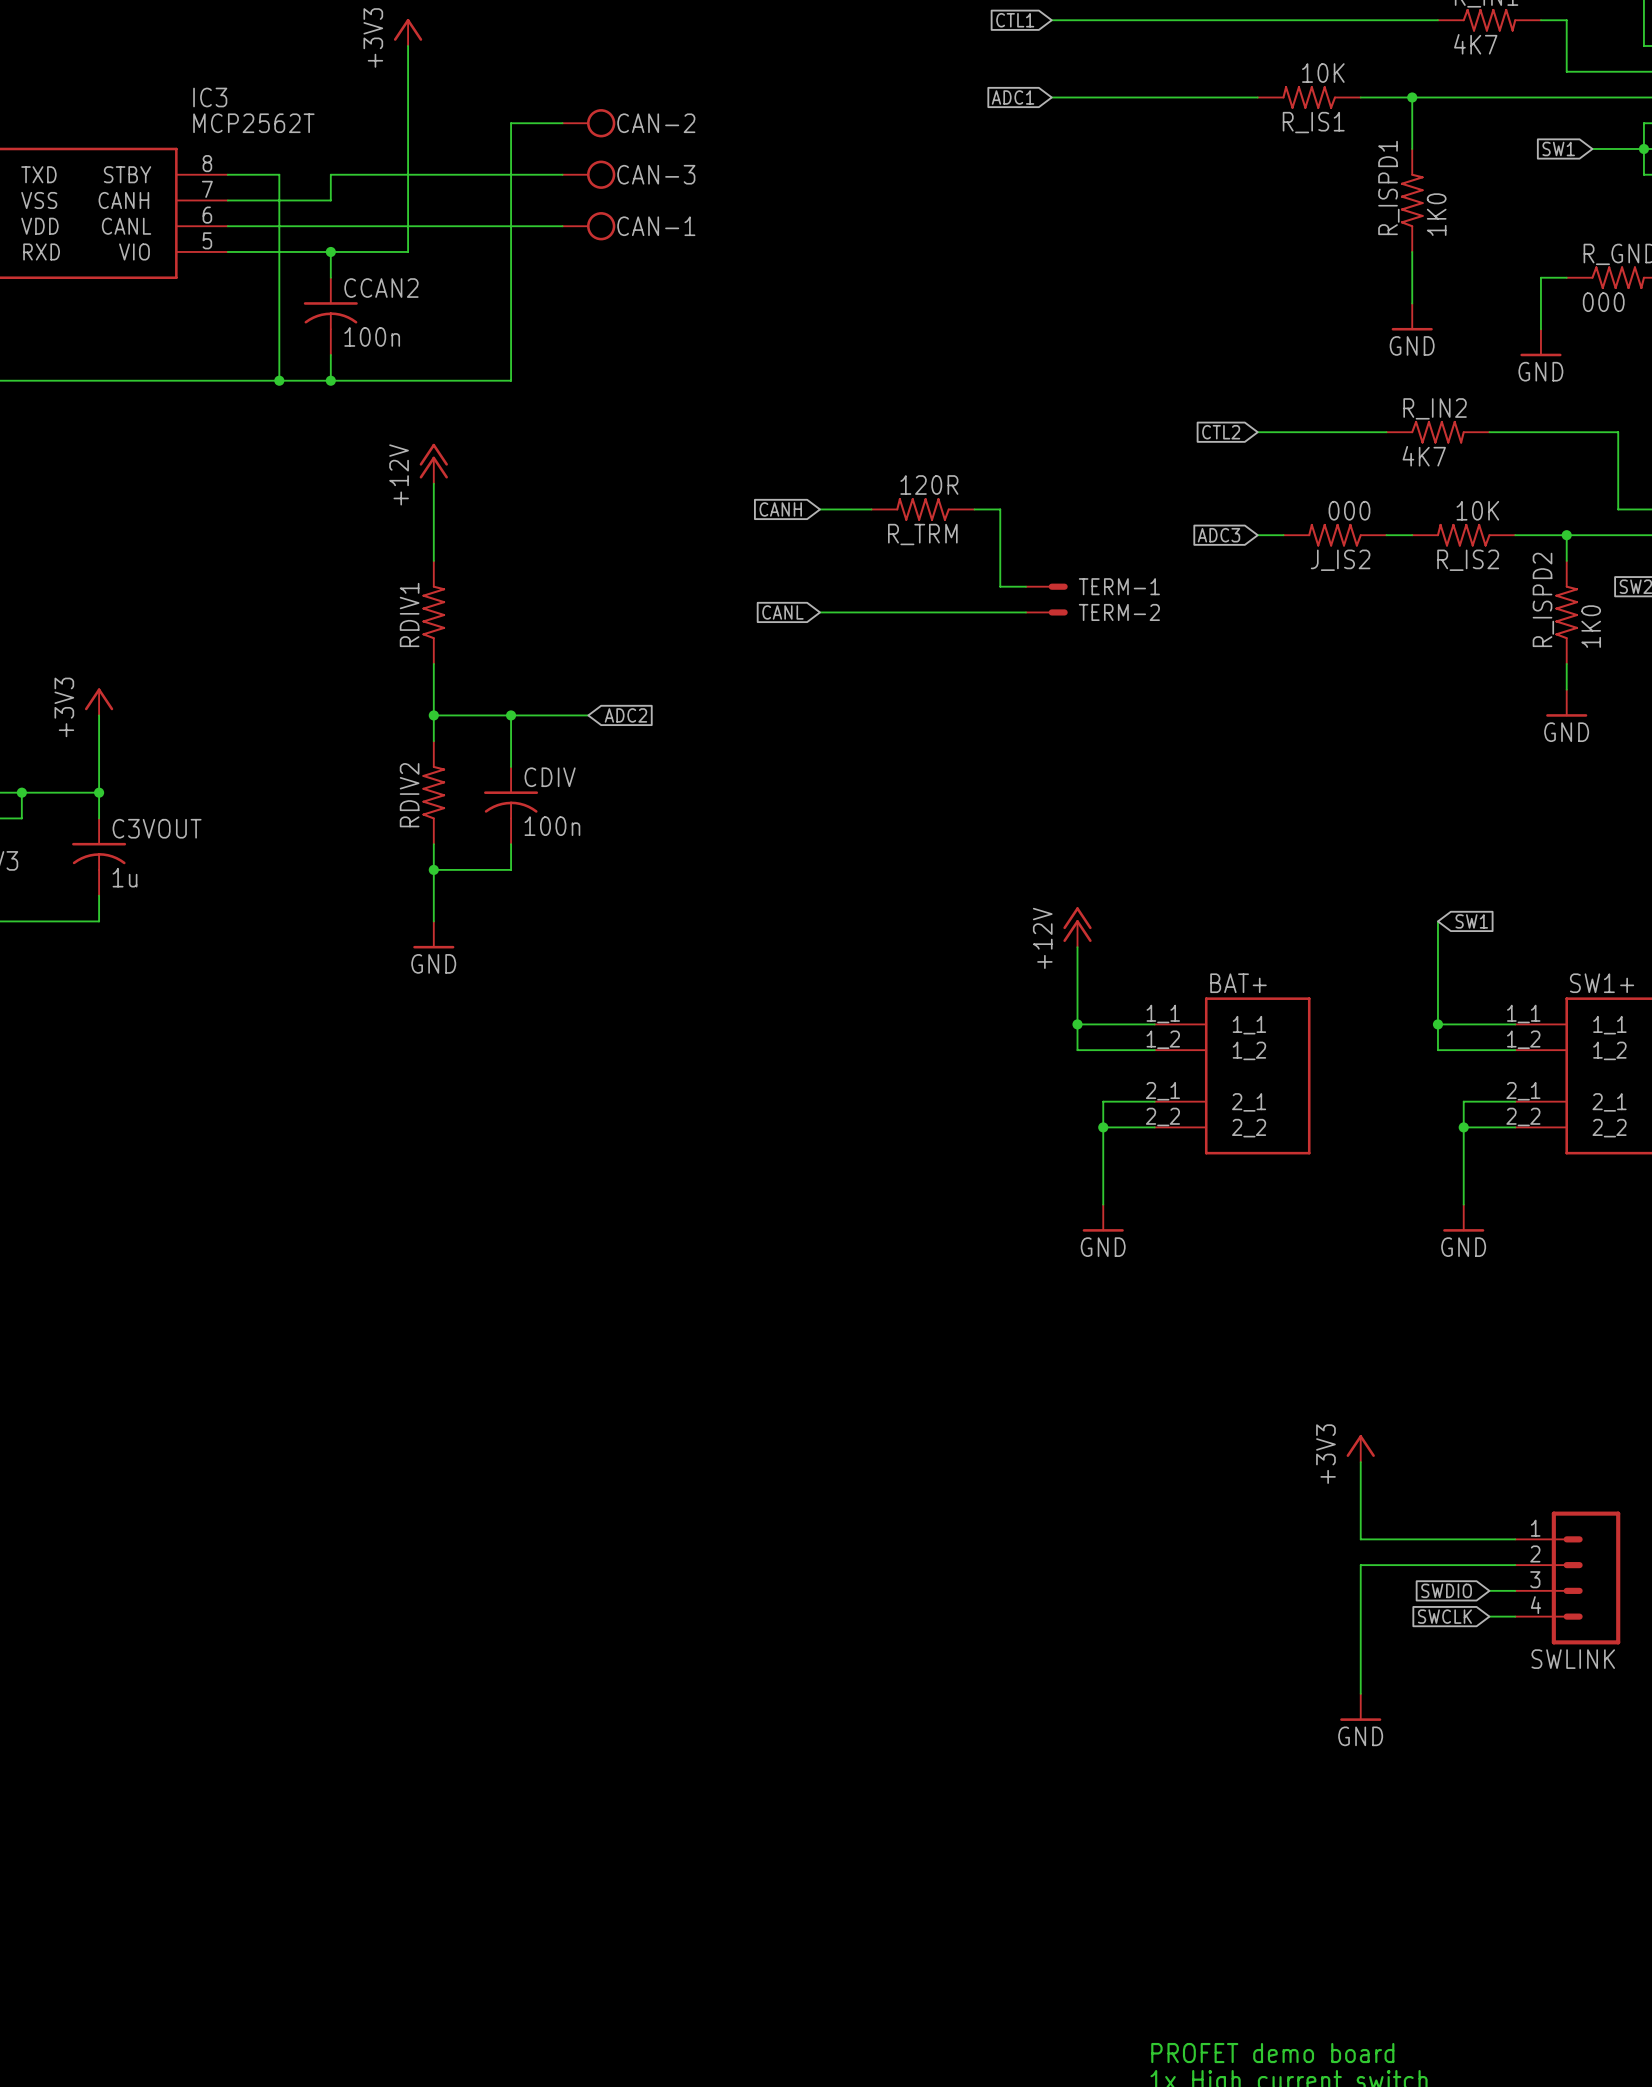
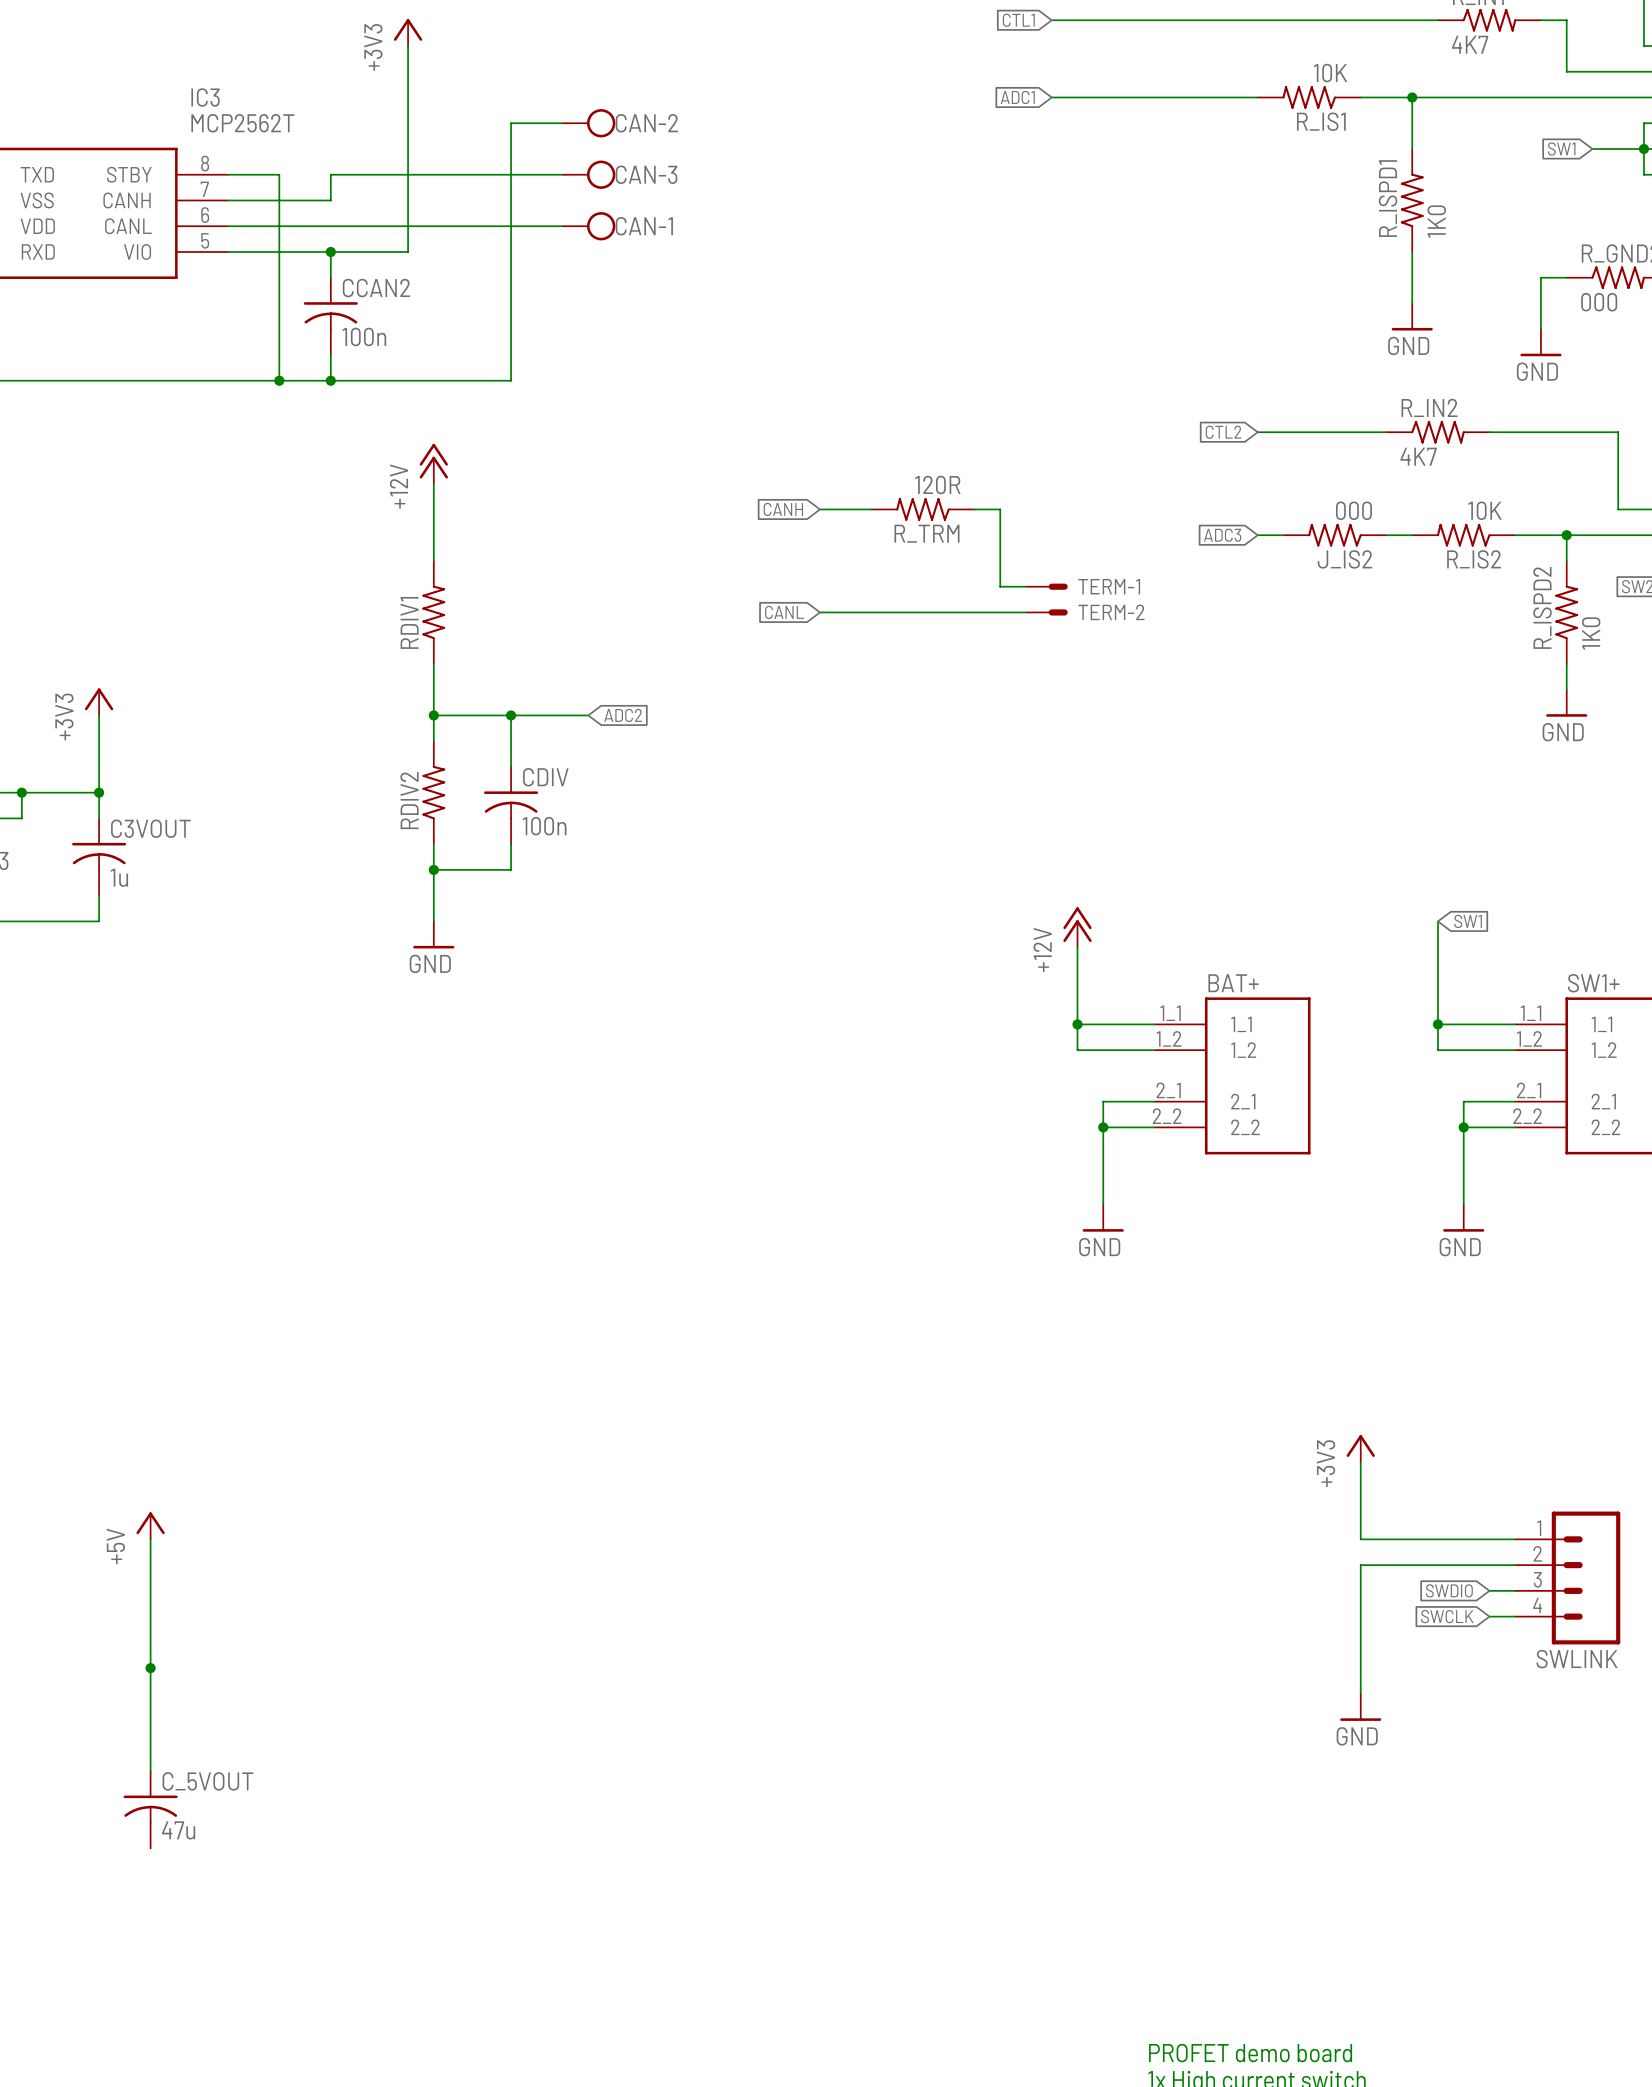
power symbol: none -> +5V (150, 1525)
wire: none -> (150, 1539) (150, 1771)
junction: none -> (150, 1668)
C_5VOUT: none -> 47u (150, 1809)

